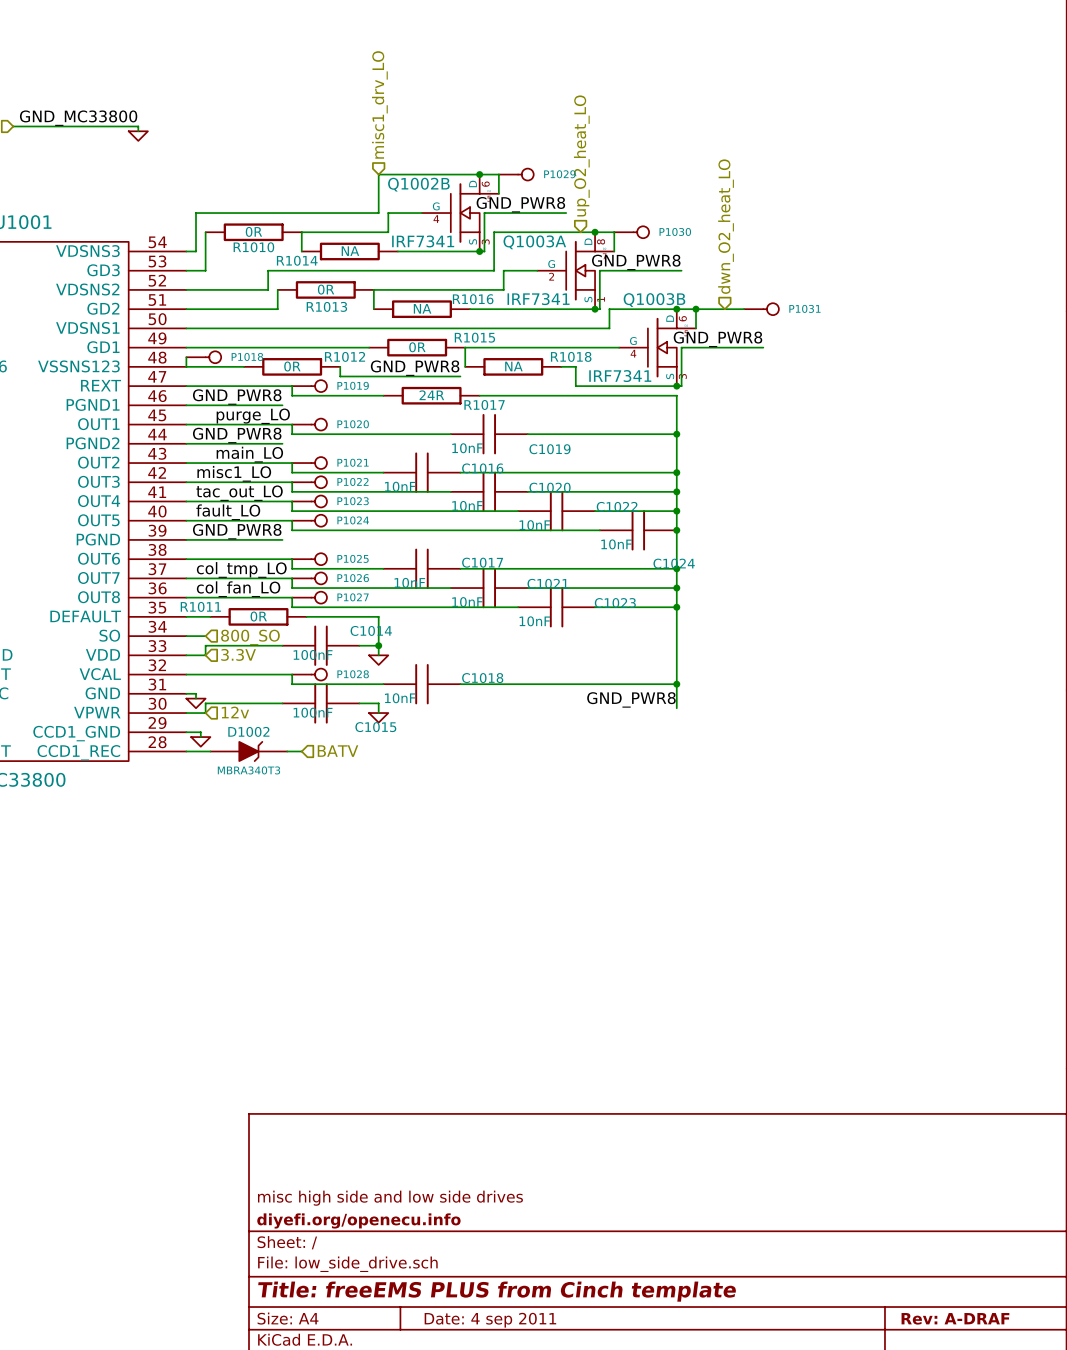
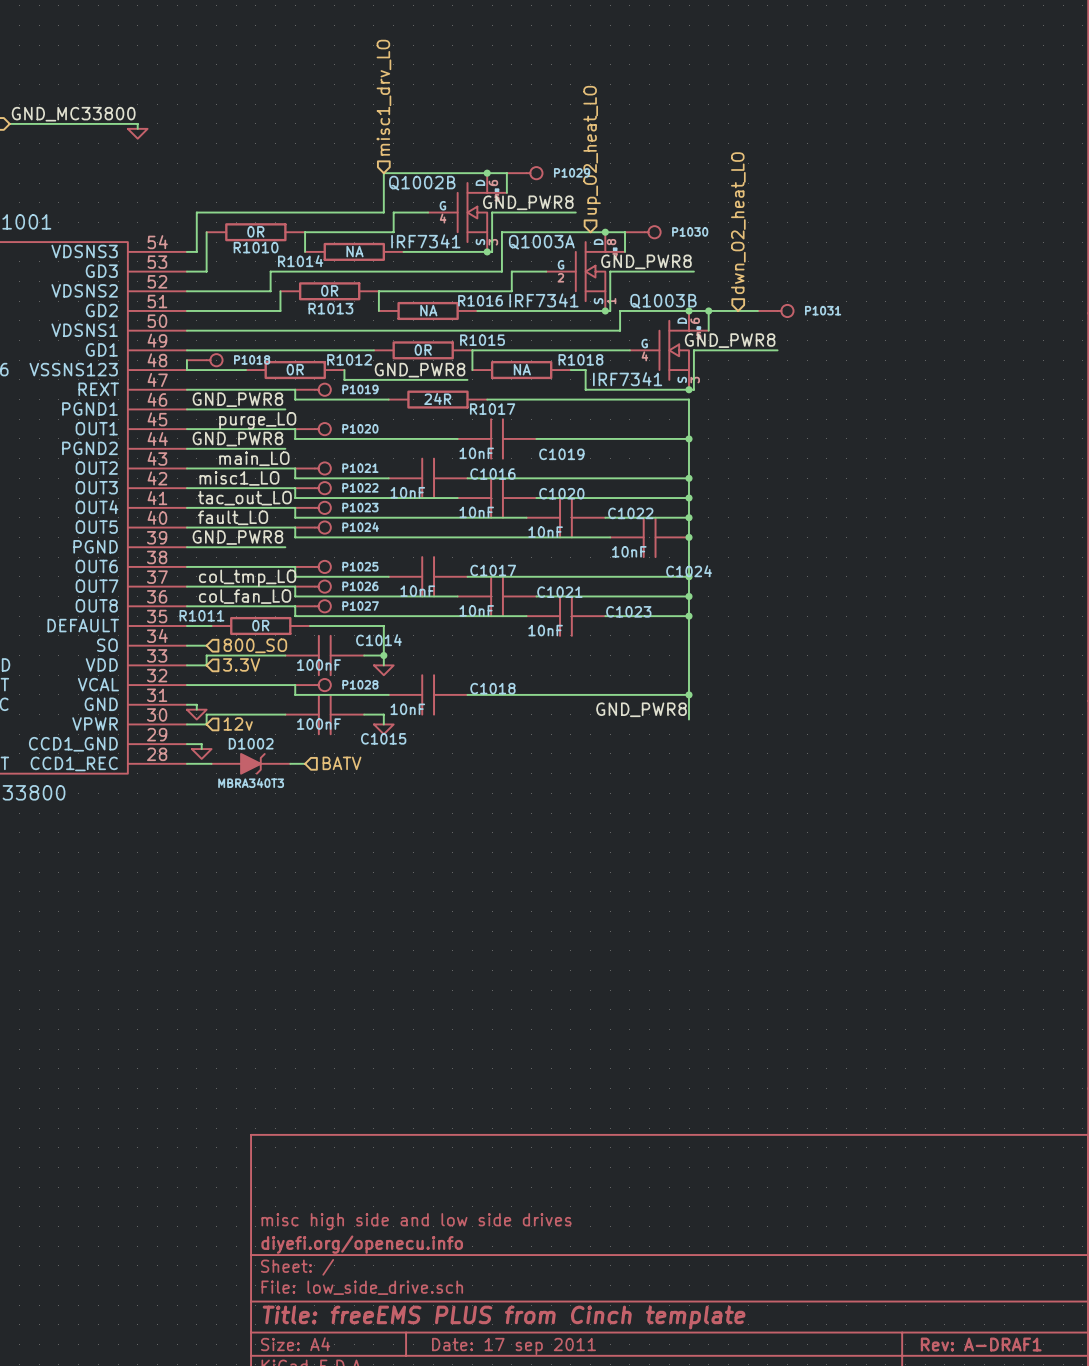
title block: Rev: A-DRAF (955, 1318) -> Rev: A-DRAF1 (981, 1344)
title block: Date: 4 sep 2011 (490, 1320) -> Date: 17 sep 2011 (513, 1346)

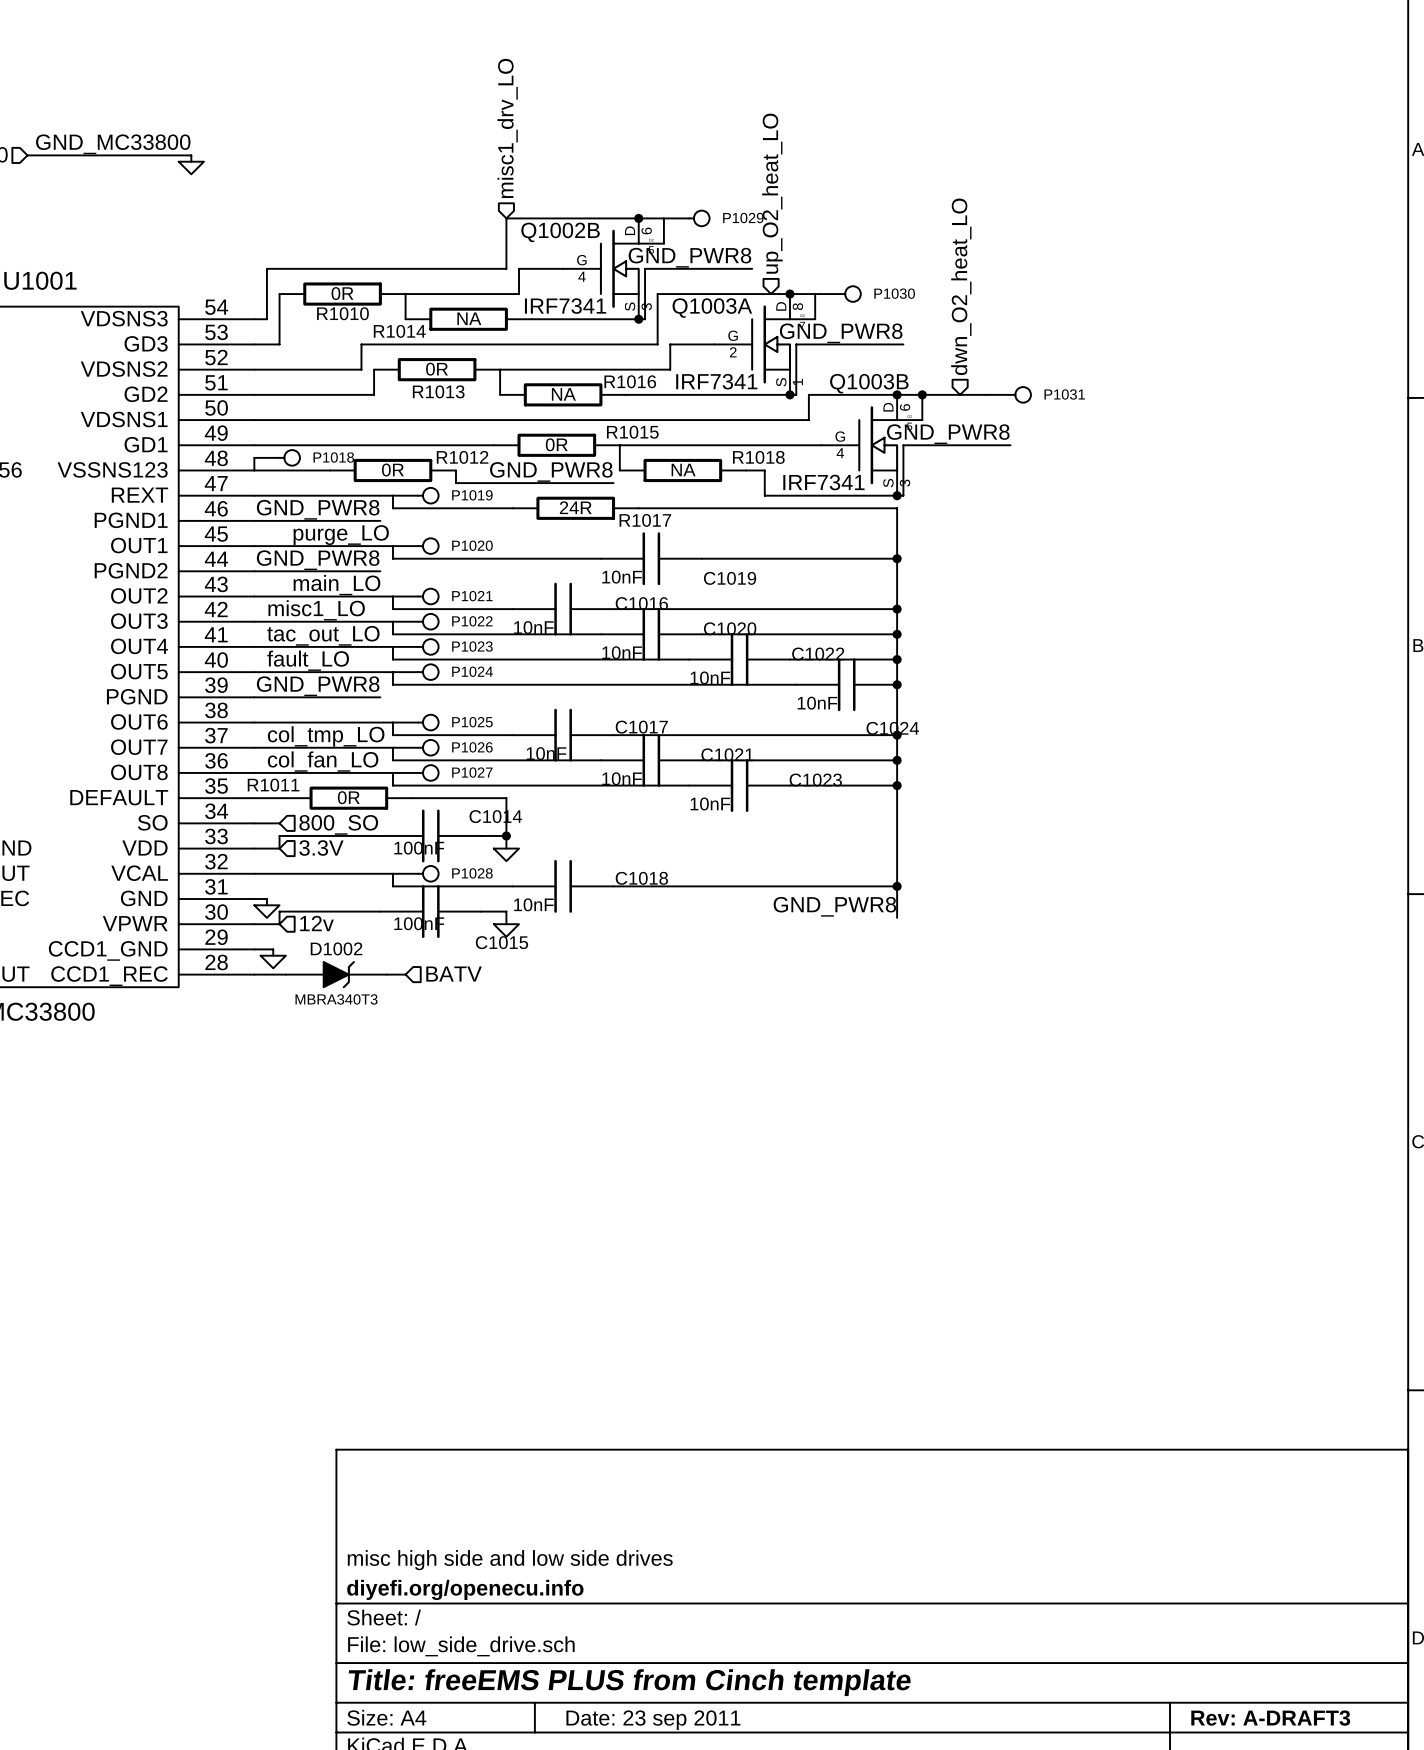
title block: Rev: A-DRAF1 (981, 1344) -> Rev: A-DRAFT3 (1270, 1718)
title block: Date: 17 sep 2011 (513, 1346) -> Date: 23 sep 2011 (653, 1720)

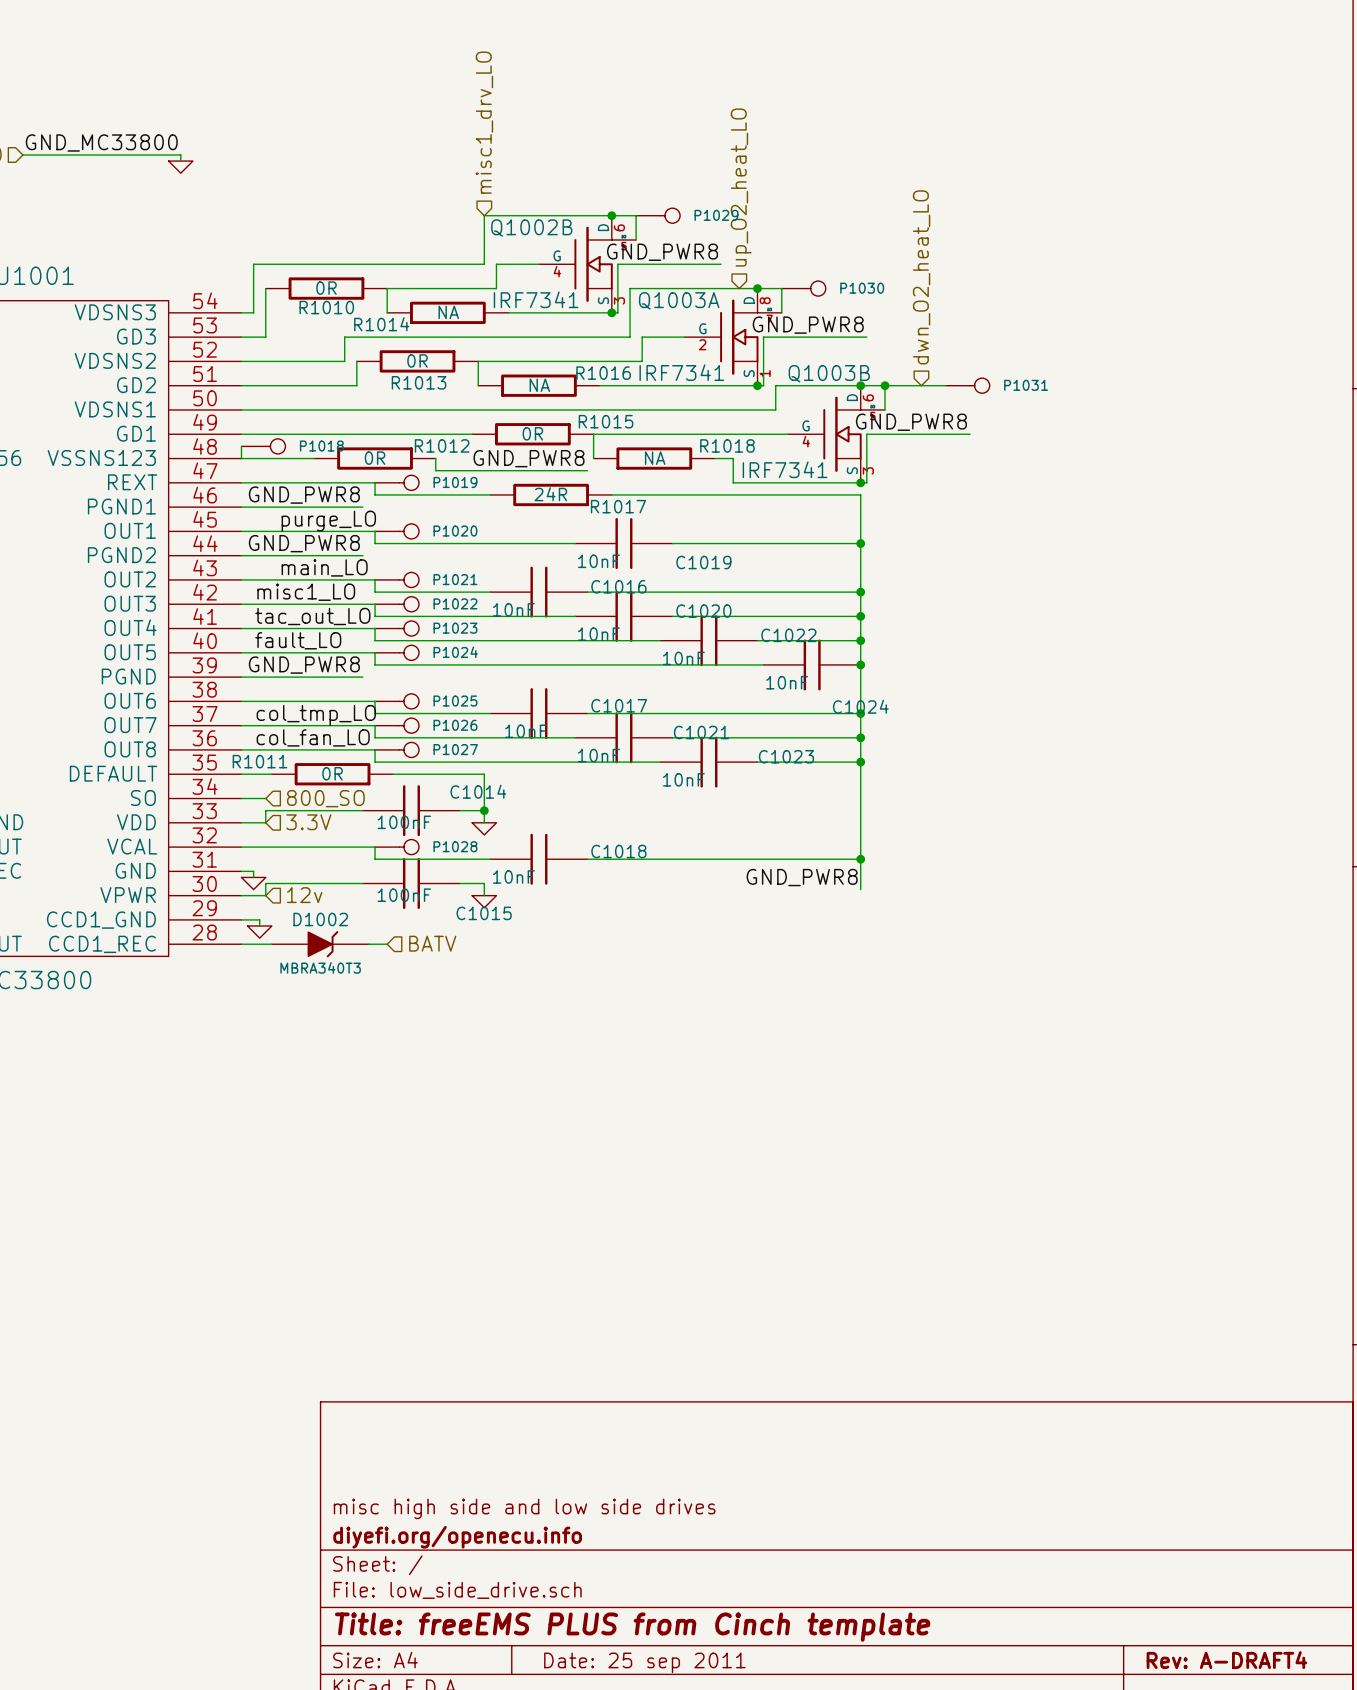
title block: Rev: A-DRAFT3 (1270, 1718) -> Rev: A-DRAFT4 (1226, 1660)
title block: Date: 23 sep 2011 (653, 1720) -> Date: 25 sep 2011 (644, 1662)

